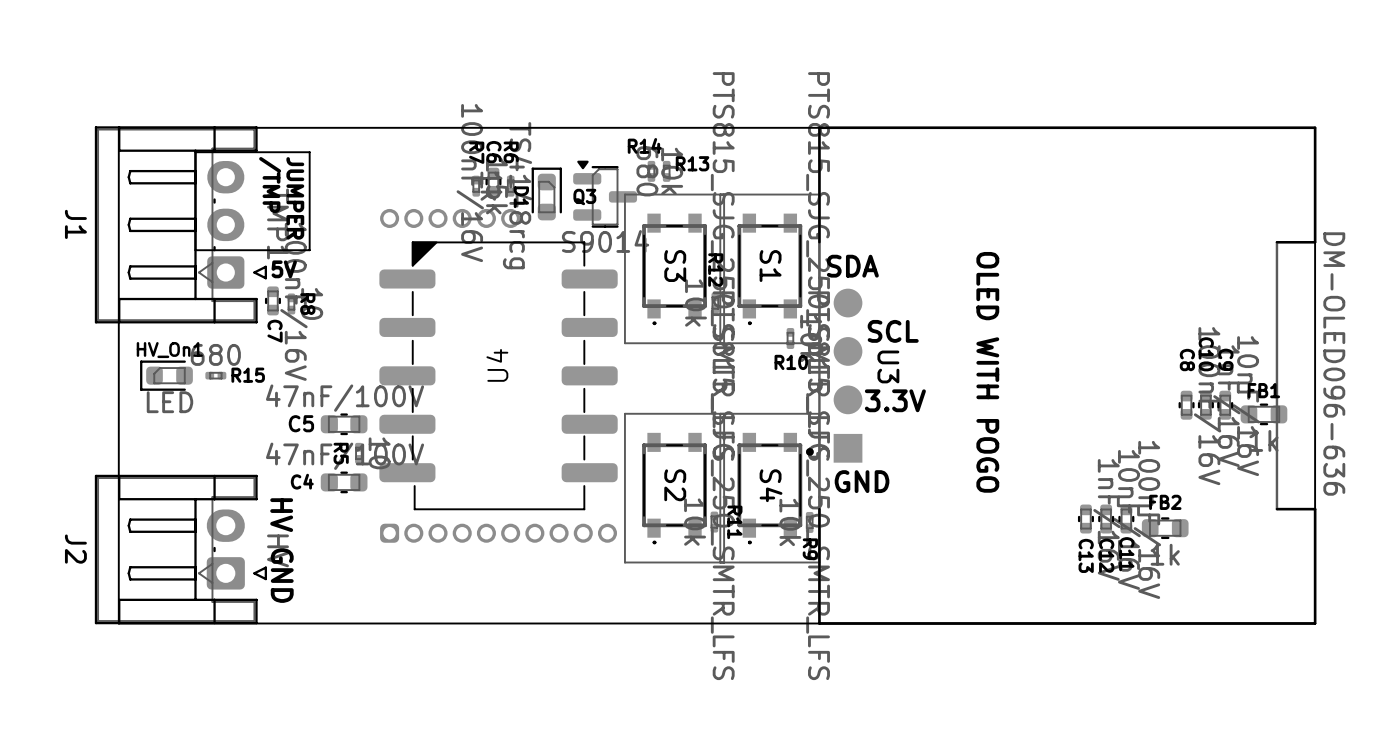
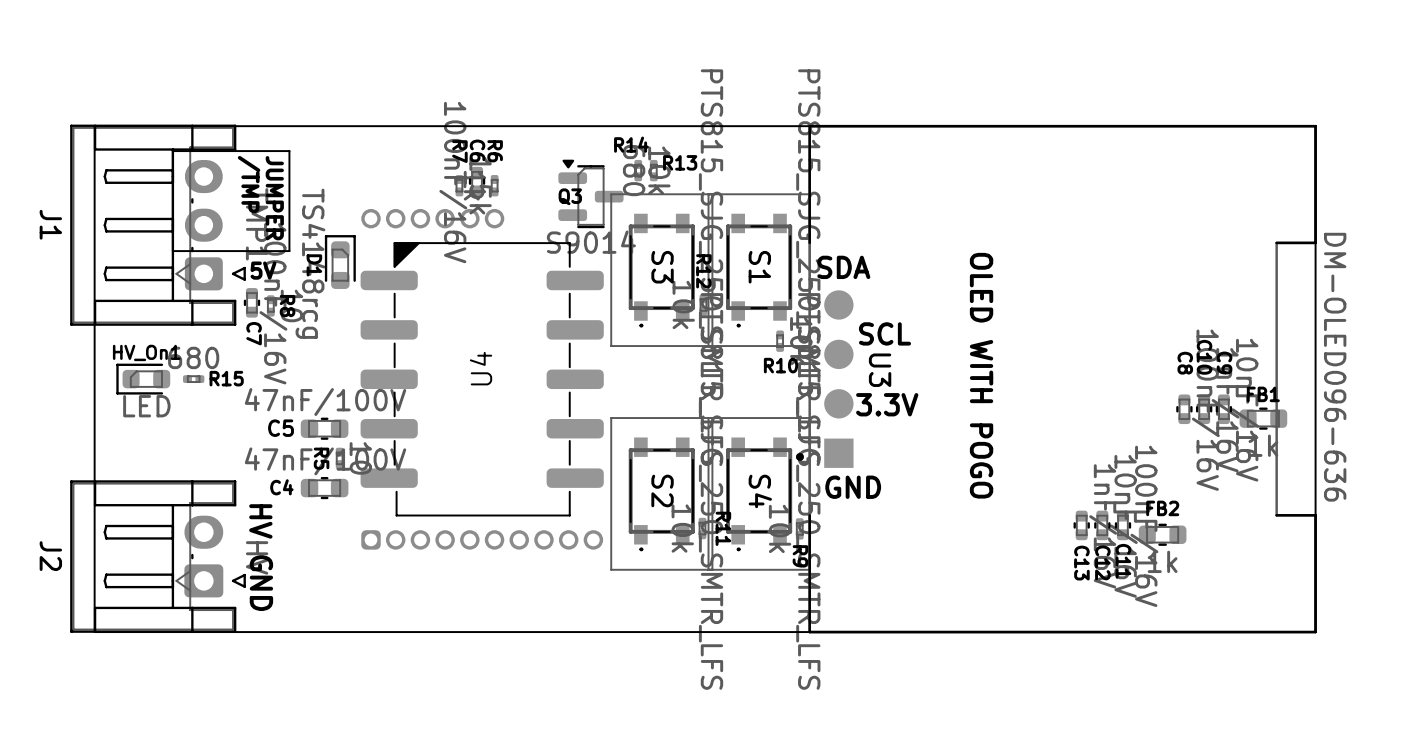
D1 position: (546, 193) -> (340, 262)

